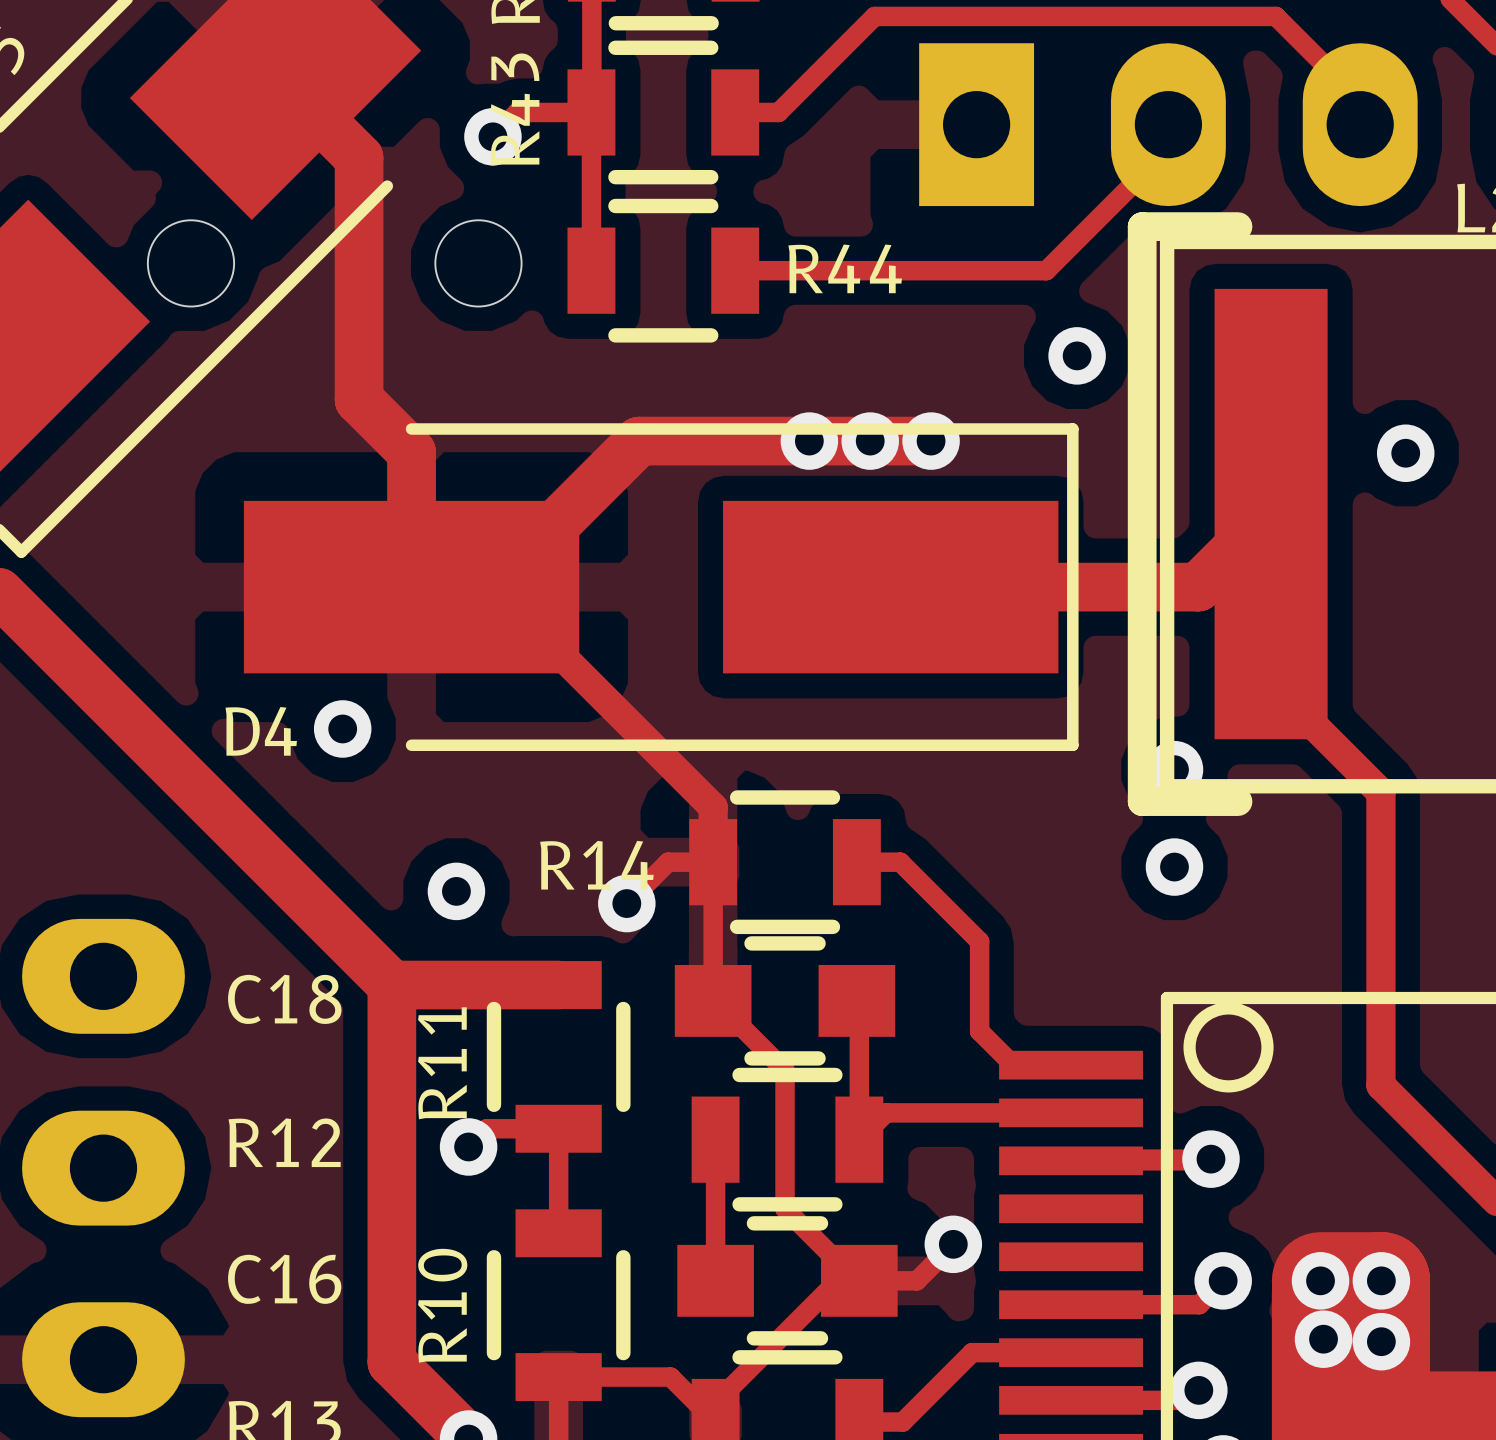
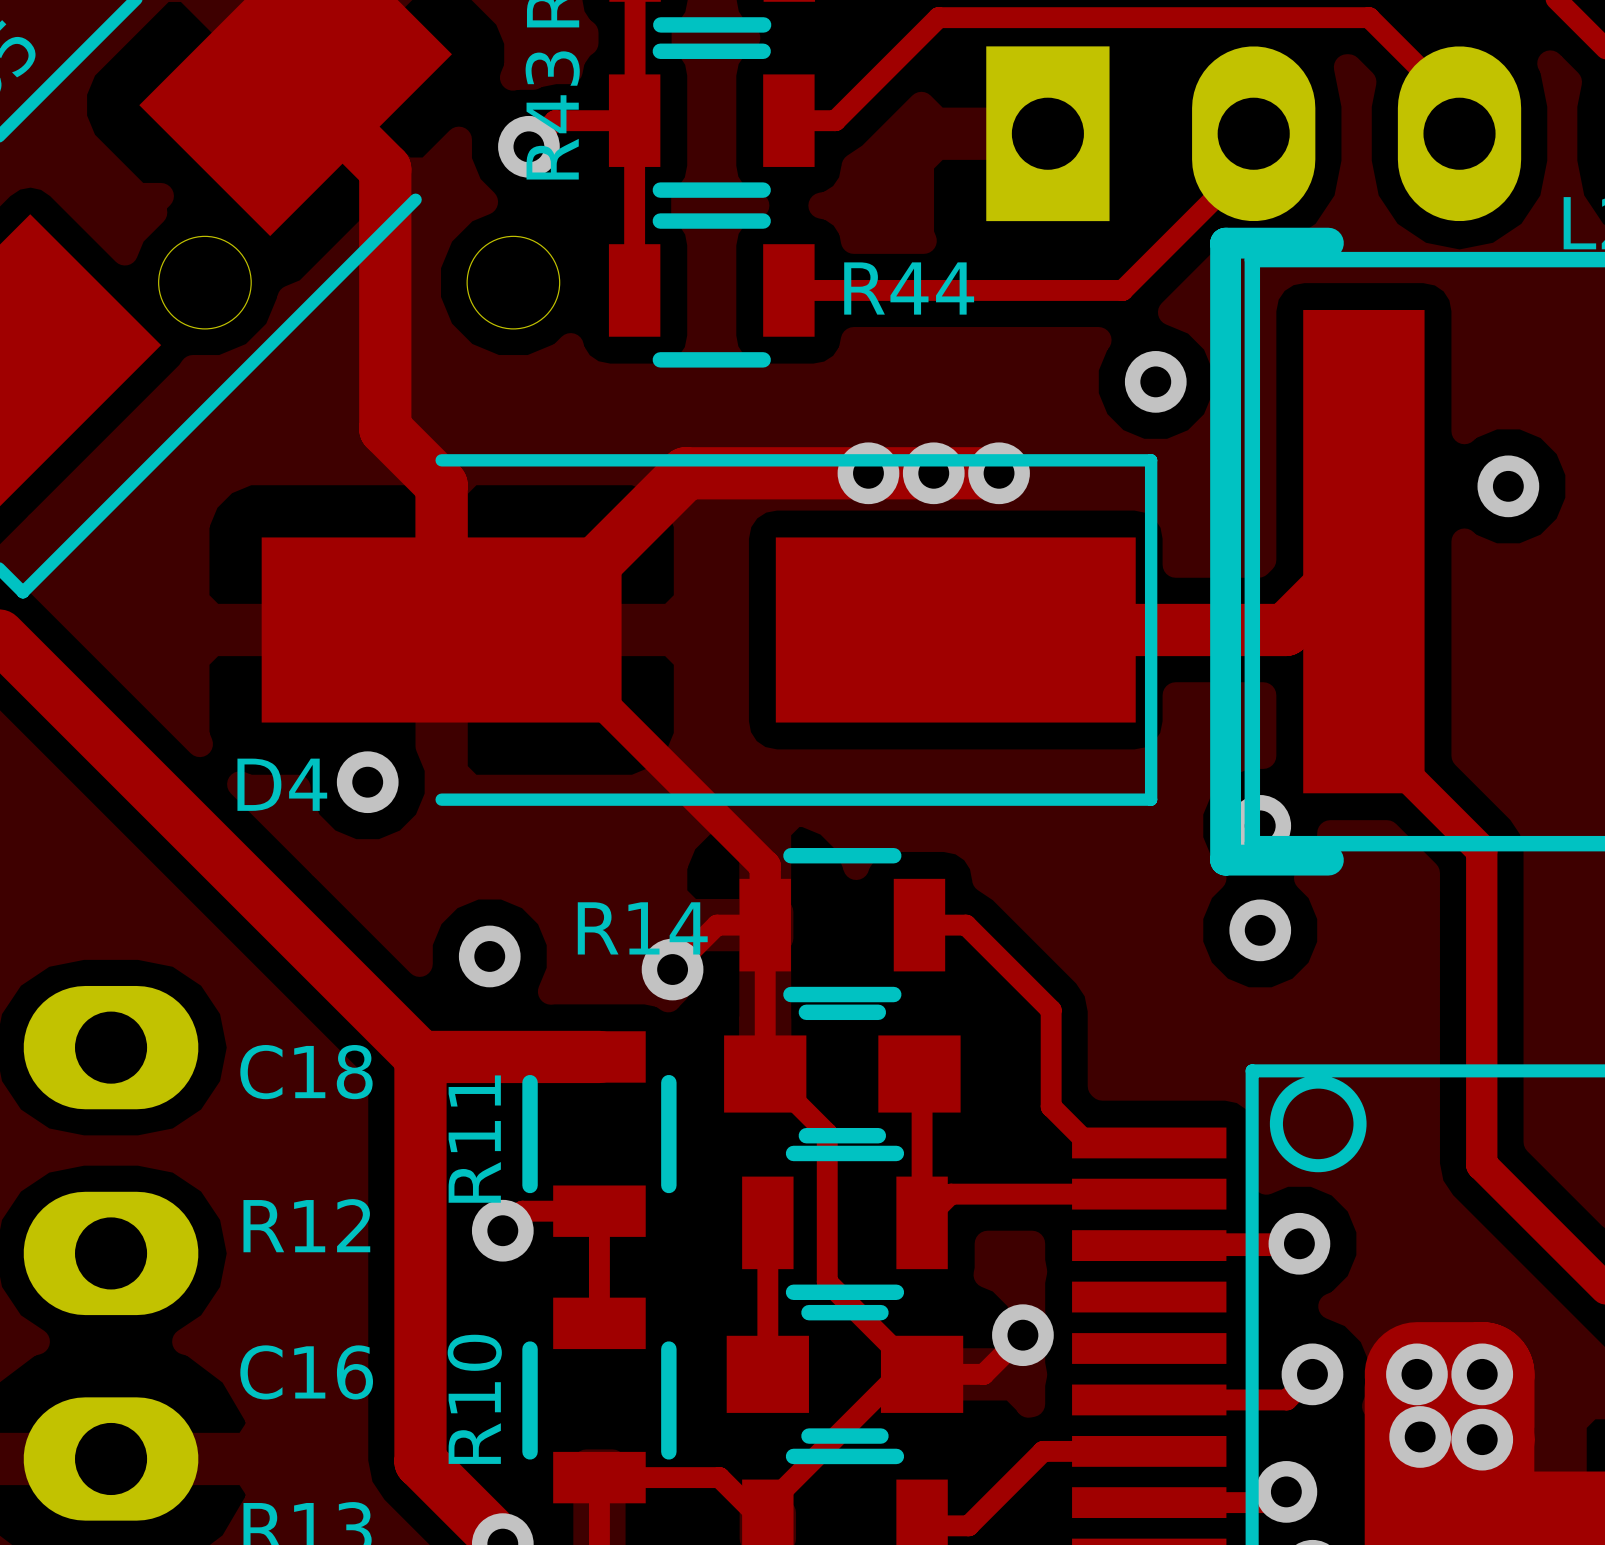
track: (770, 1056) (785, 1070) (785, 1208) -> (827, 1133) (827, 1282) (842, 1297)

